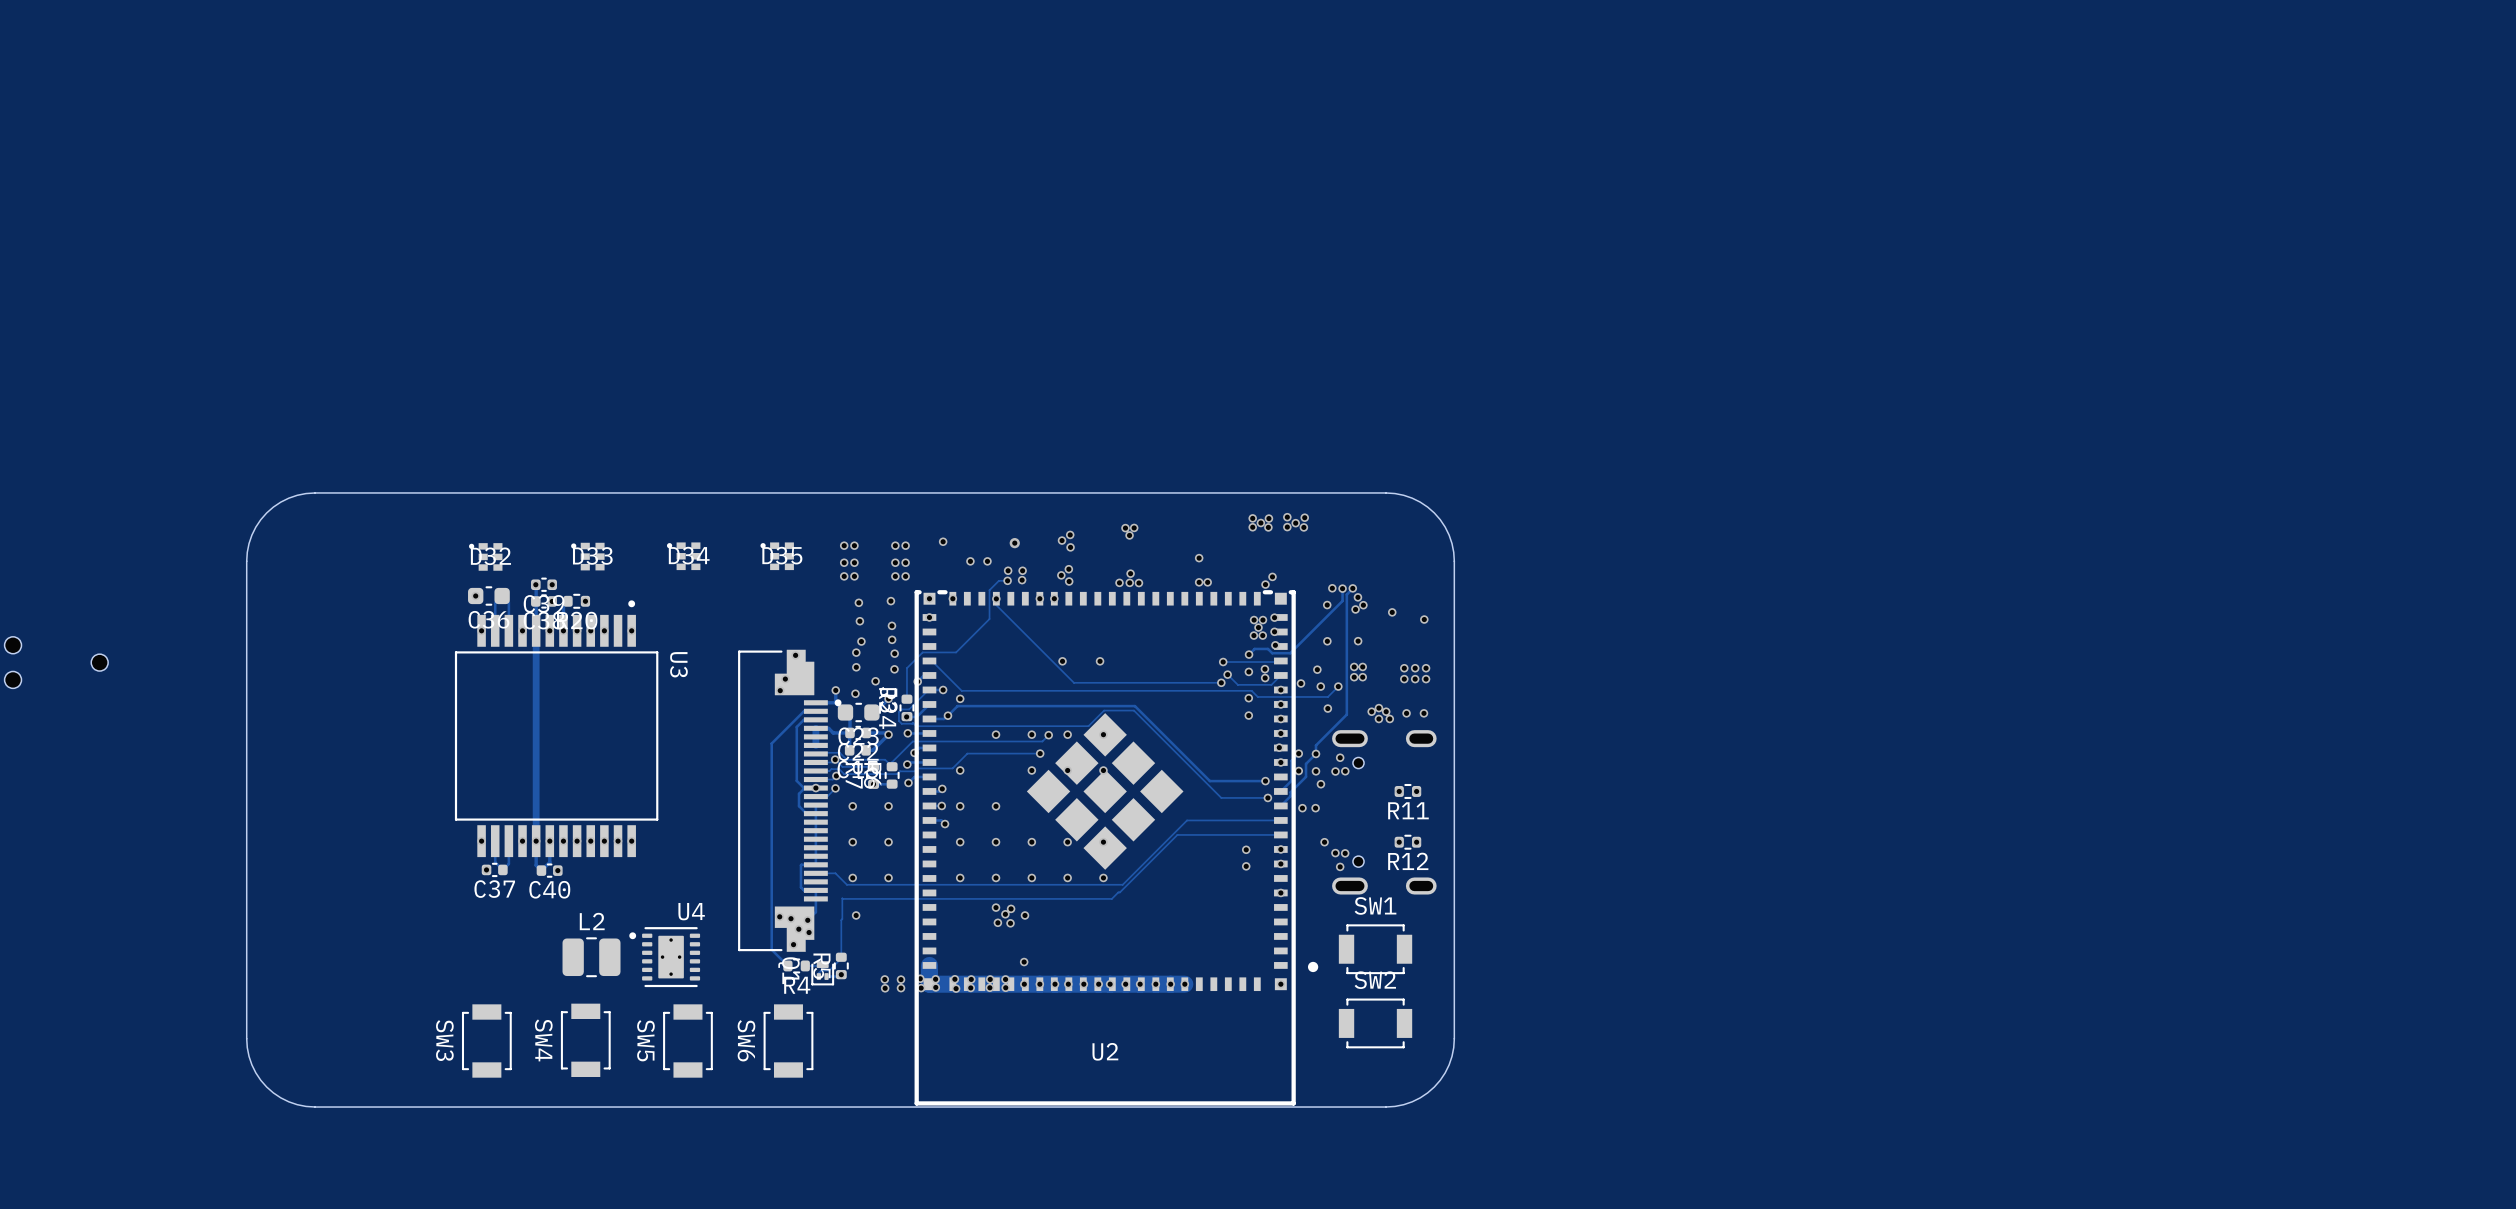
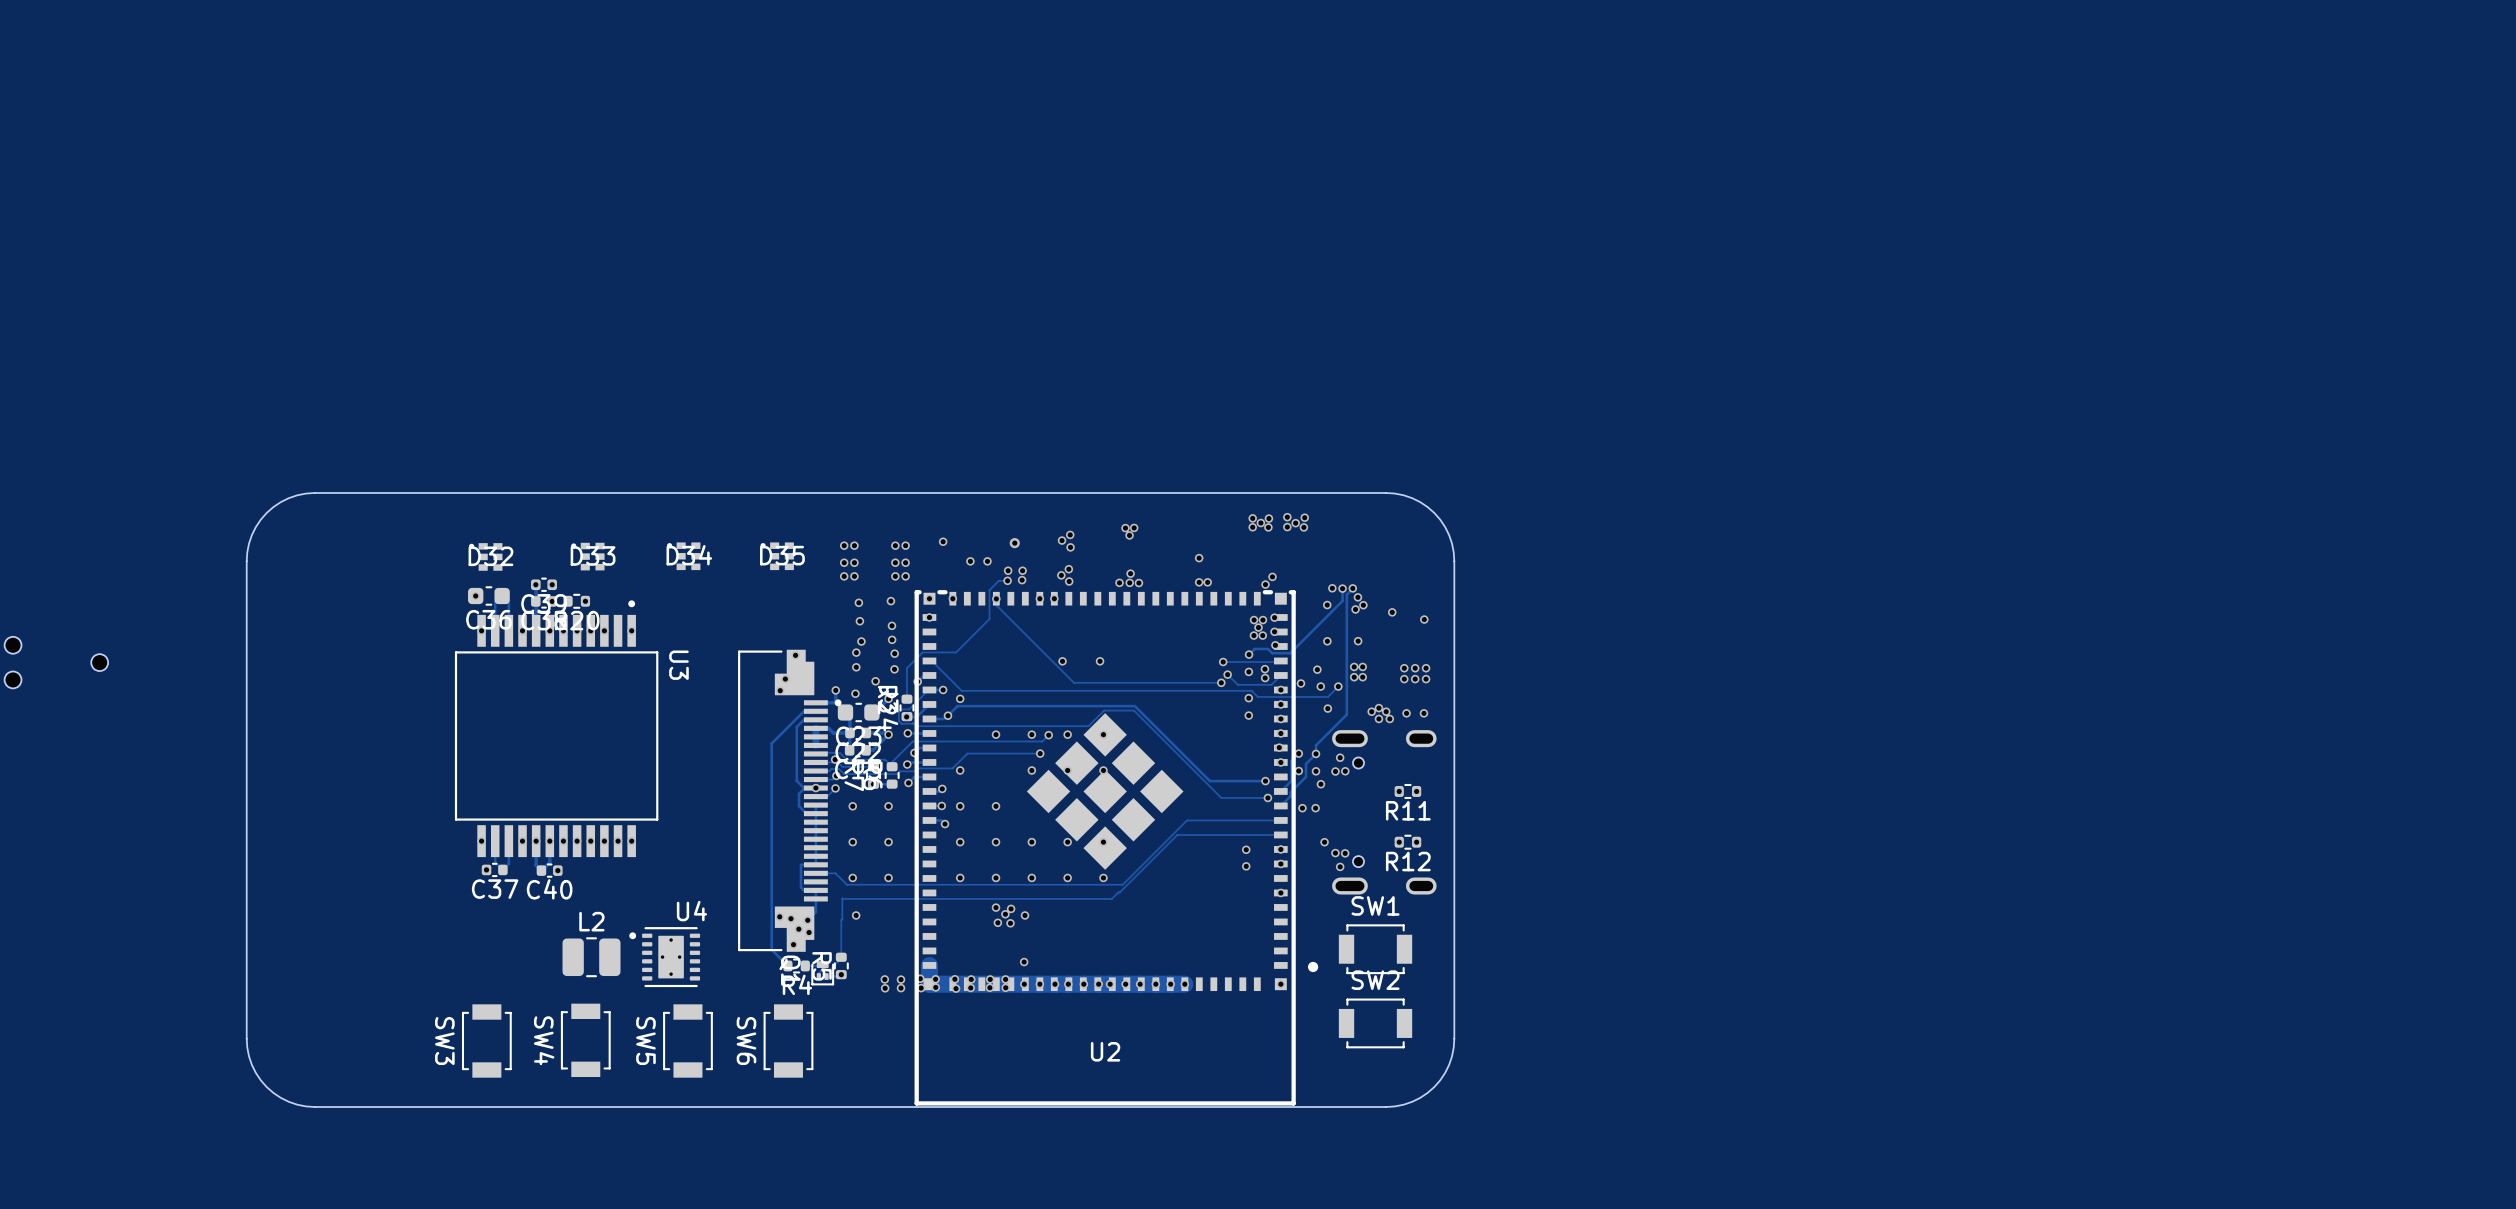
track: (536, 630) (536, 841) -> none

